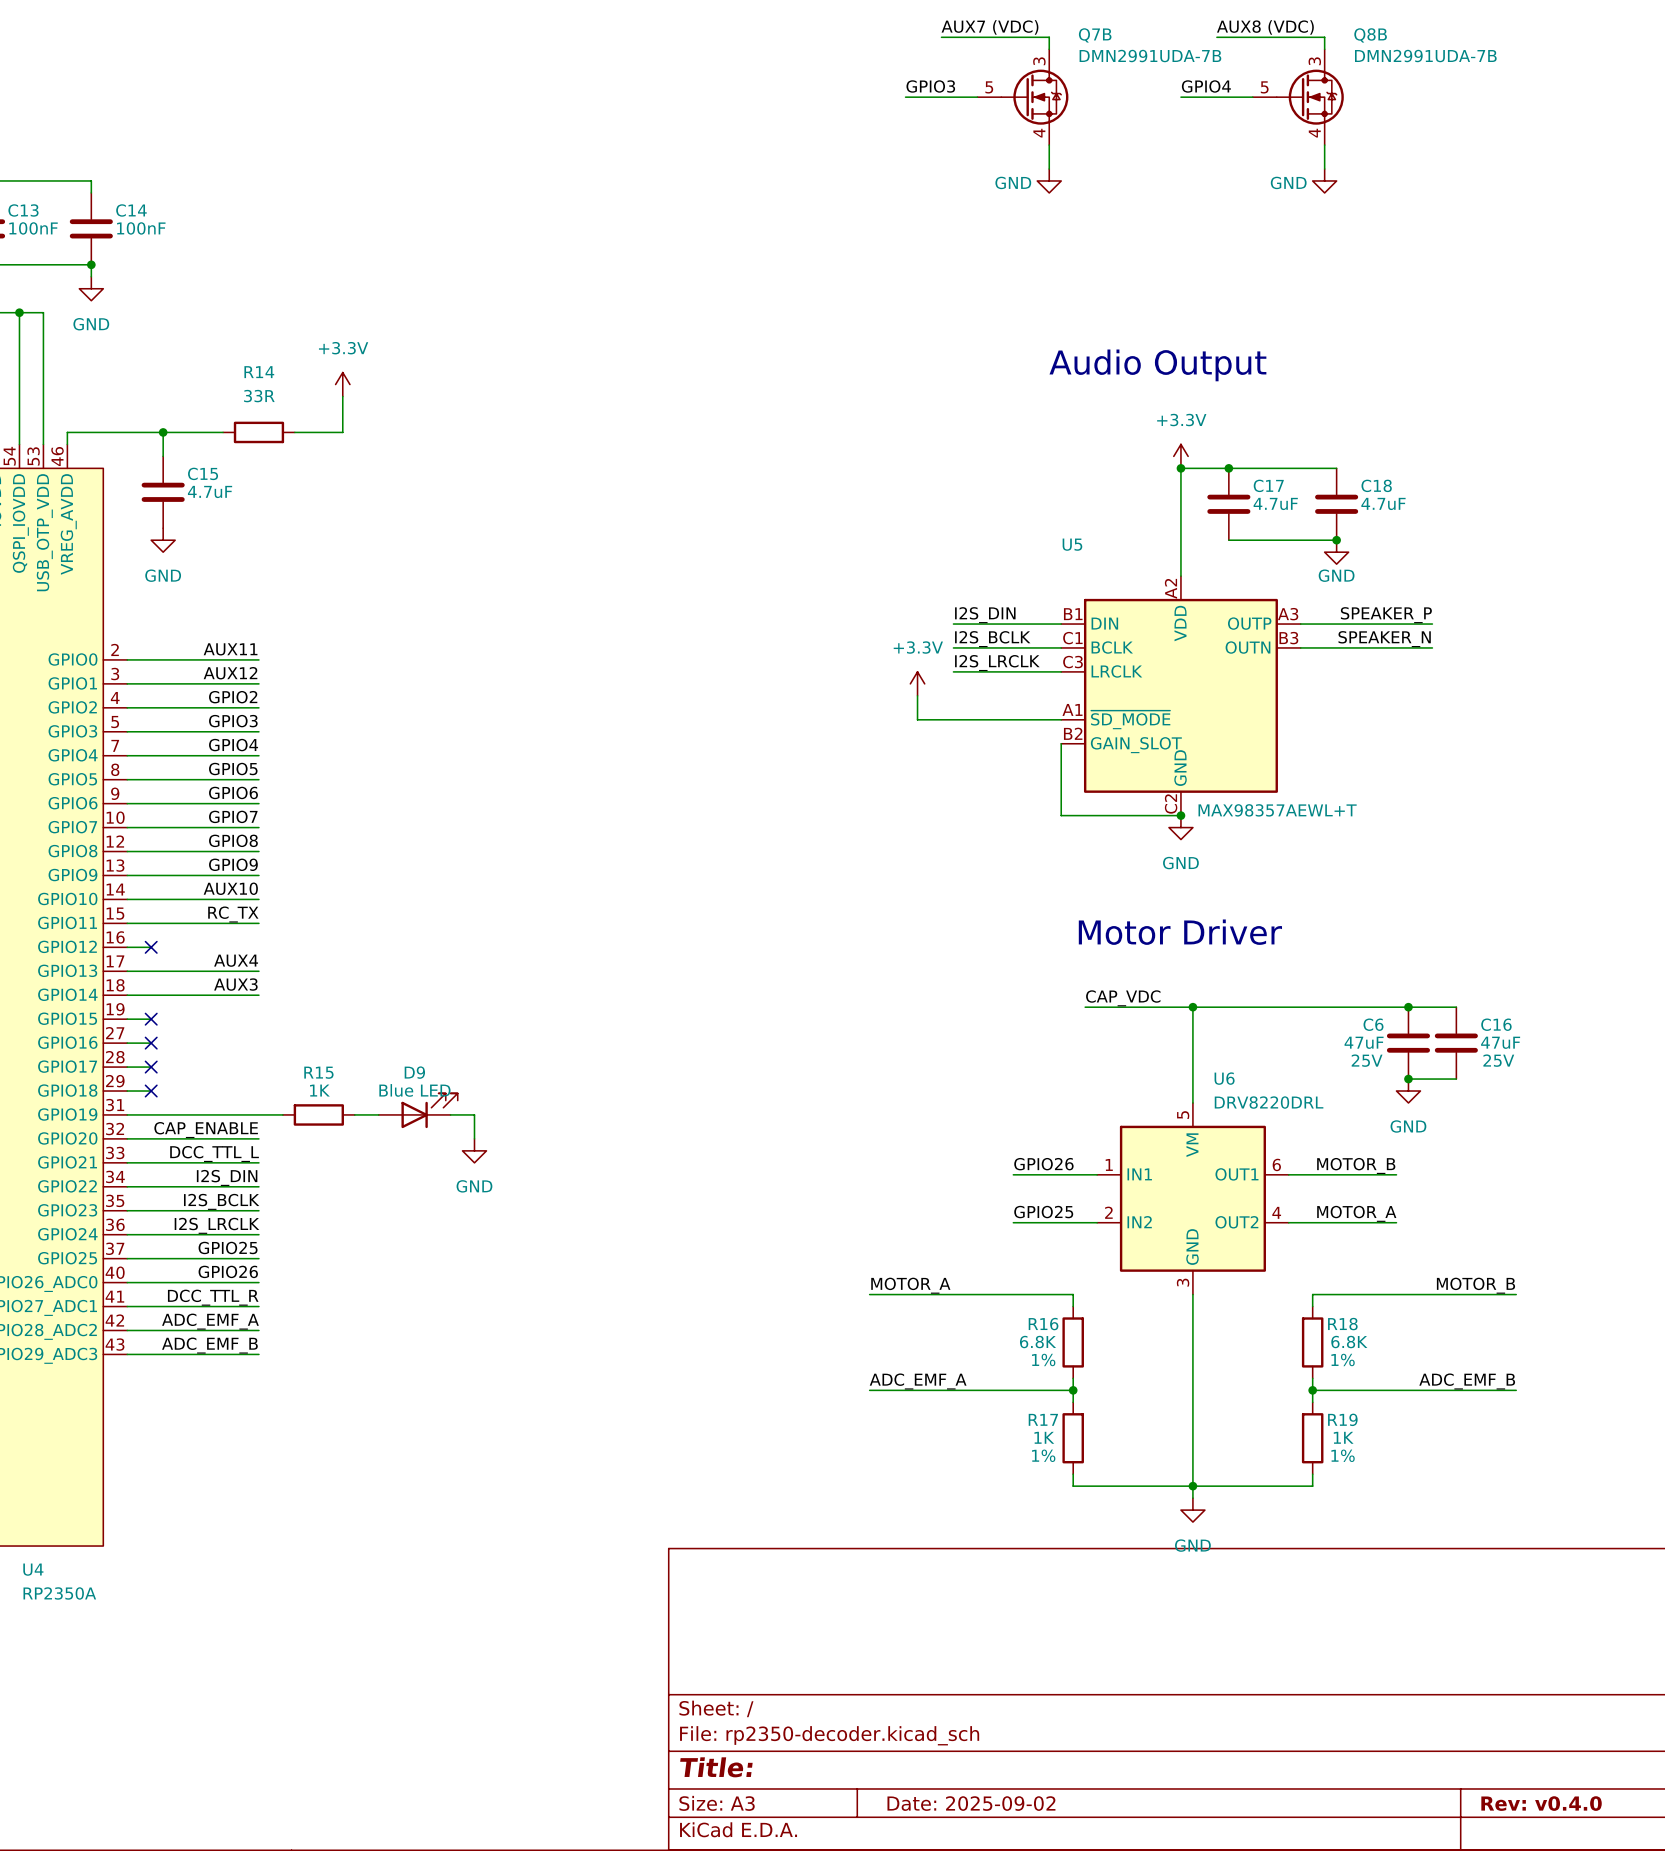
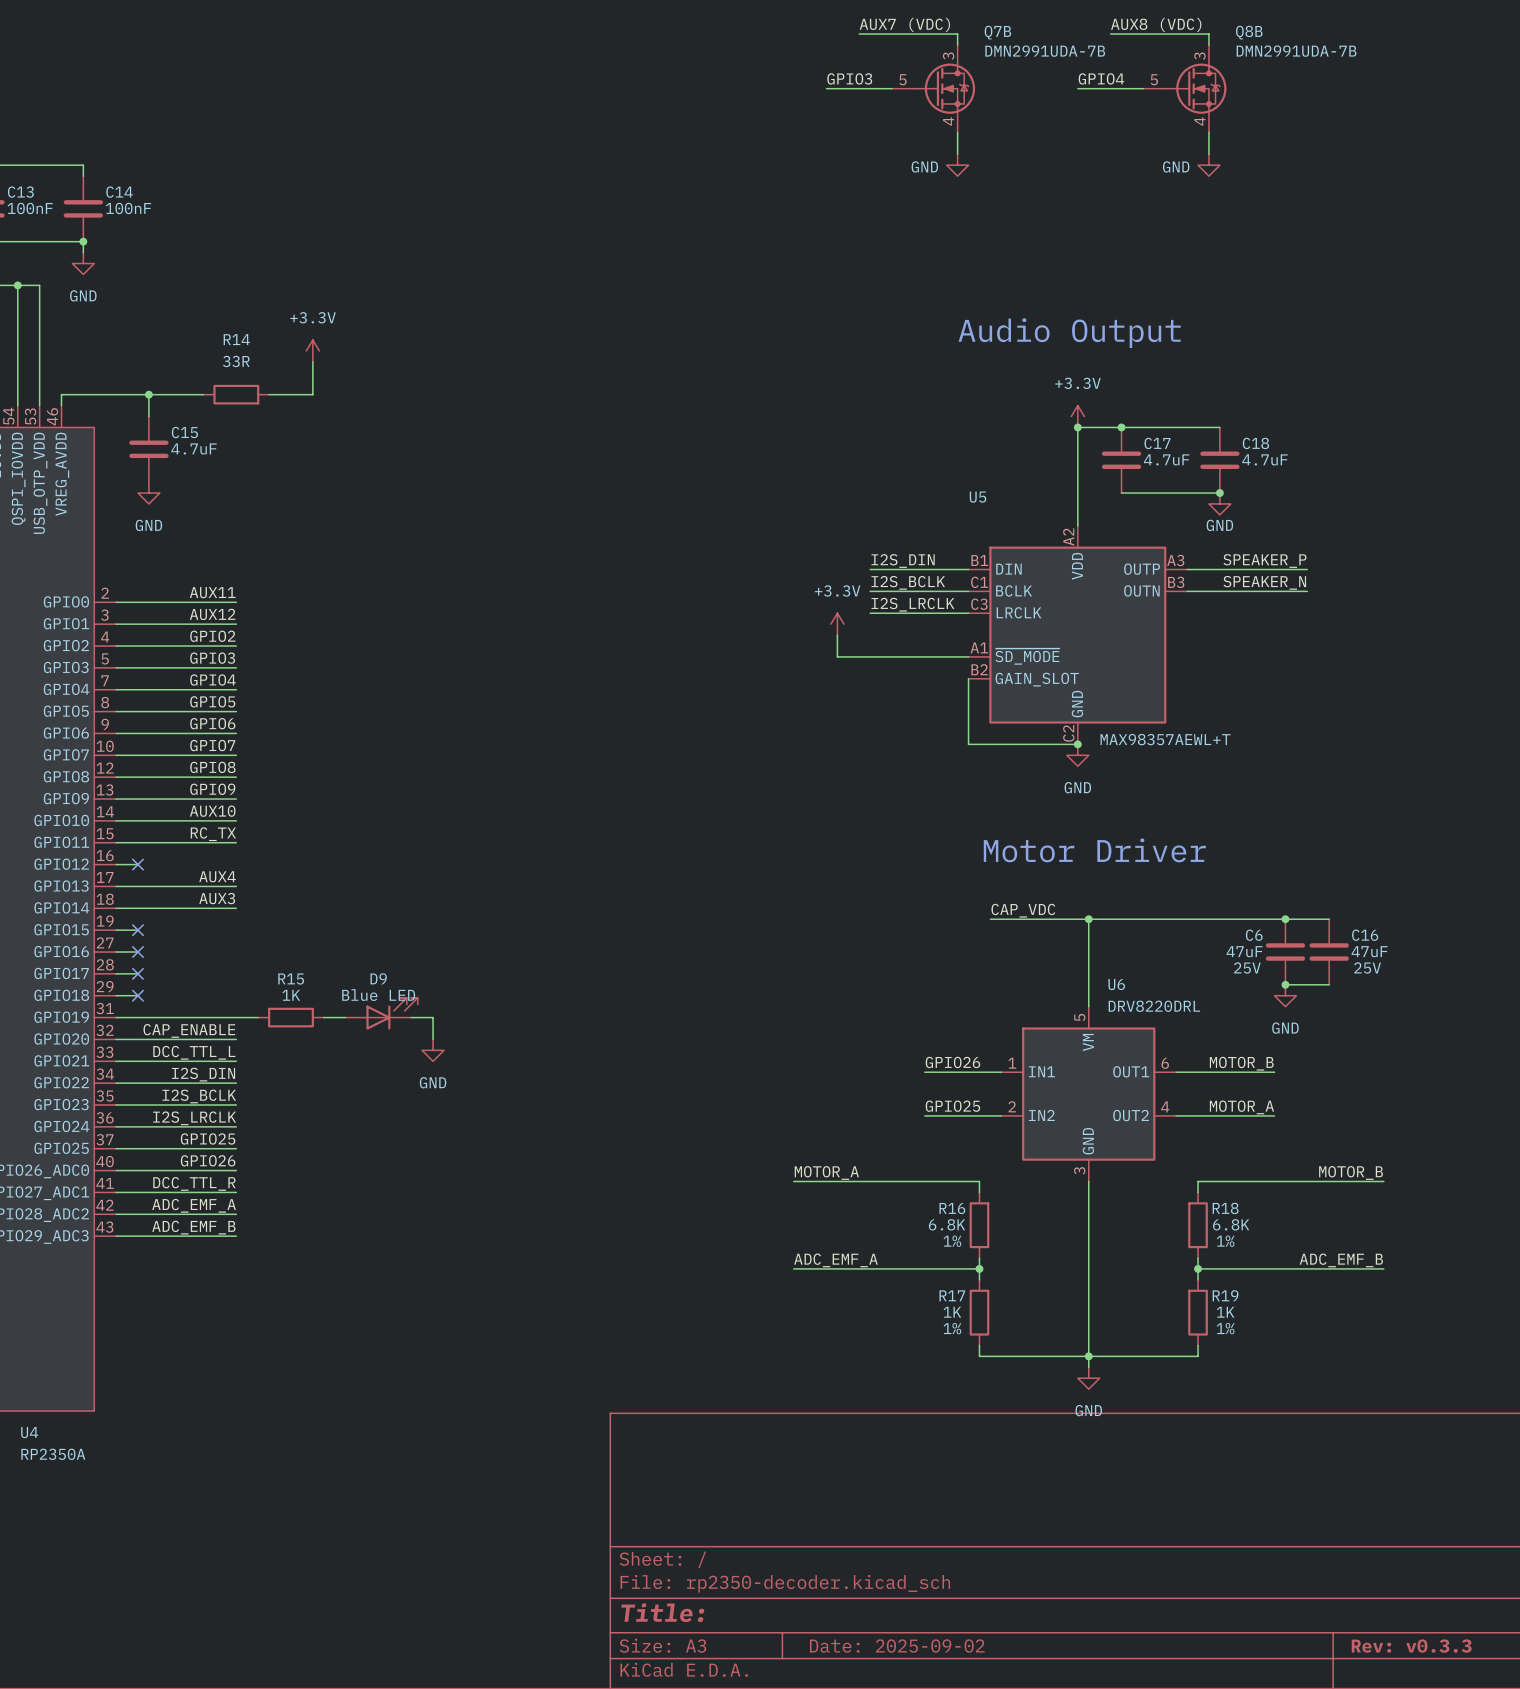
title block: Rev: v0.4.0 (1541, 1803) -> Rev: v0.3.3 (1411, 1646)

